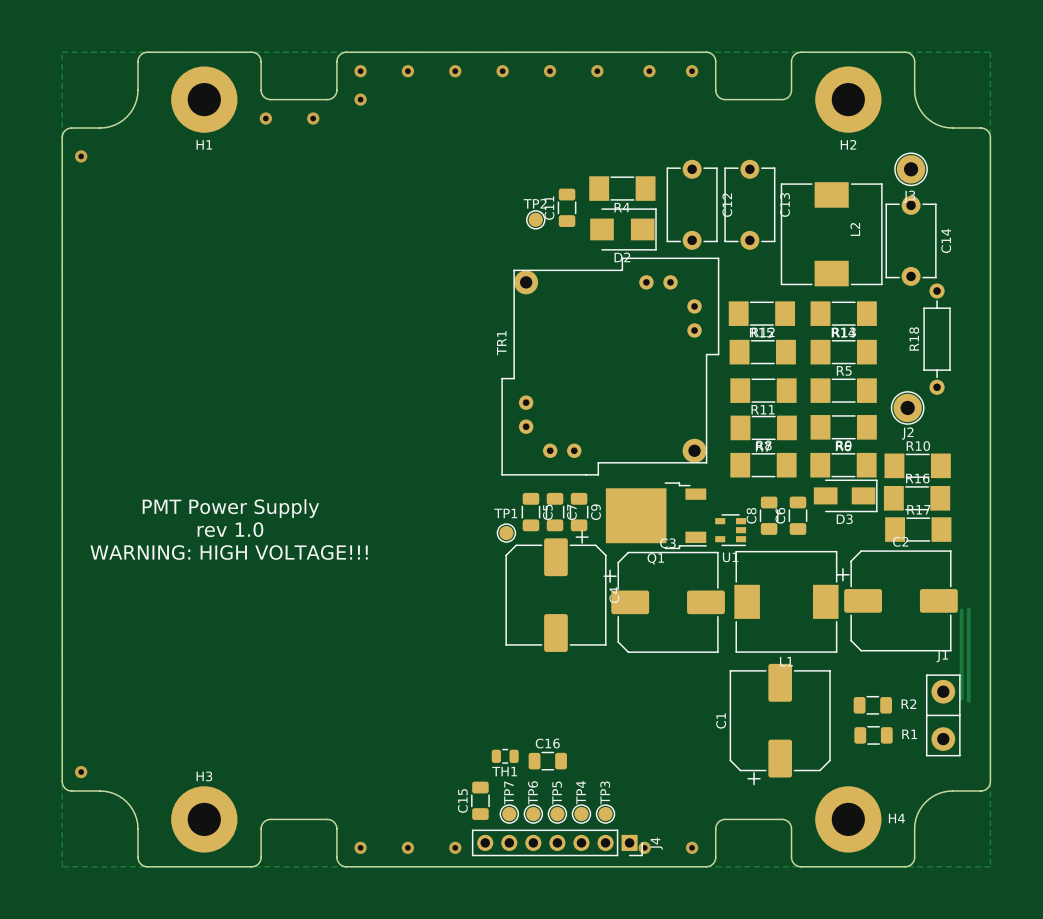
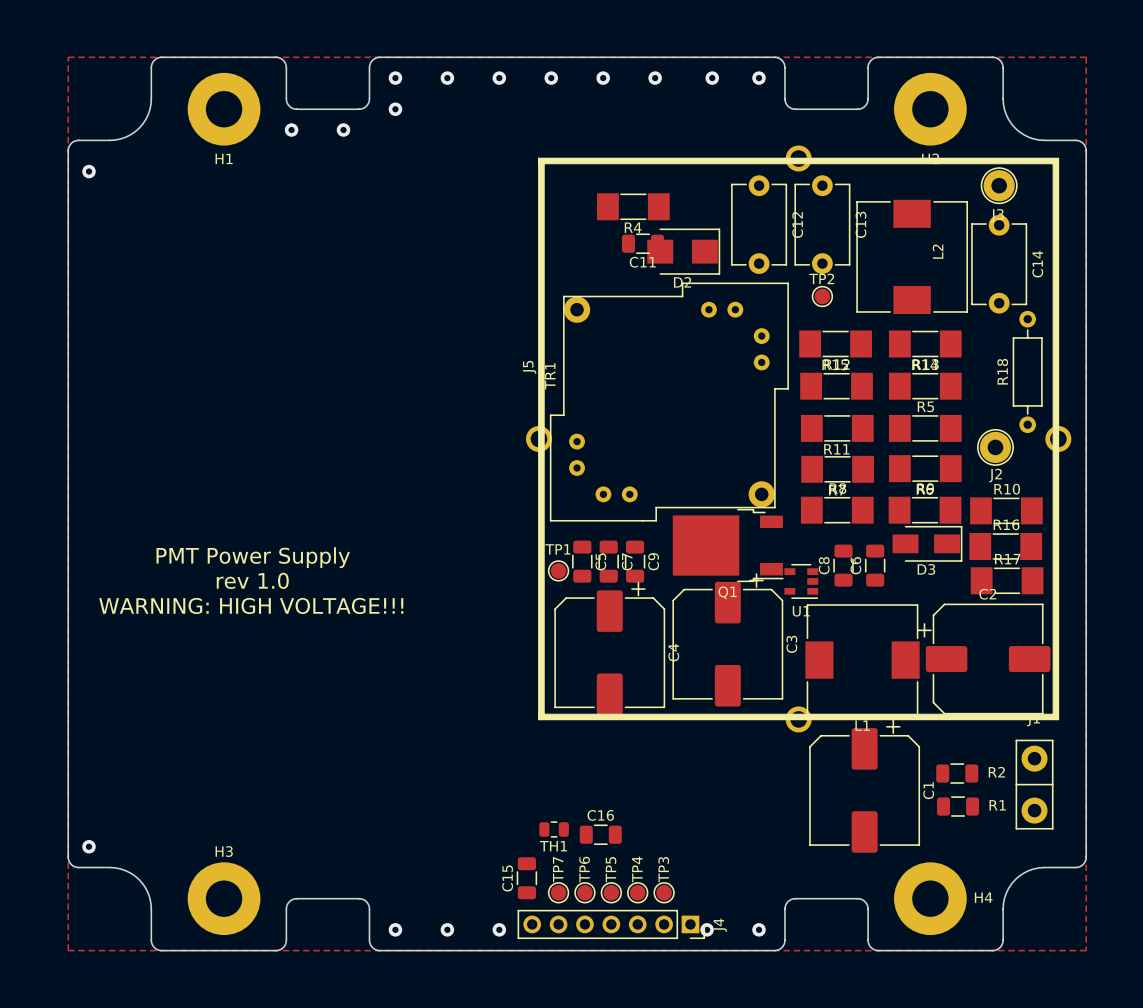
R4 position: (622, 188) -> (633, 206)
C11 rotation: 0° (567, 207) -> 90° clockwise (643, 243)
C11 position: (567, 207) -> (643, 243)
C11 name position: C11 (549, 208) -> C11 (642, 262)
TP2 position: (535, 219) -> (822, 296)
J5: none -> (798, 438)
Q1 position: (656, 515) -> (728, 545)
TP1 position: (506, 533) -> (558, 570)
C3 rotation: 0° (664, 602) -> 90° clockwise (727, 639)
track: (968, 609) (968, 700) -> none
track: (961, 610) (961, 698) -> none
C1 rotation: 0° (780, 724) -> 180° (864, 786)

